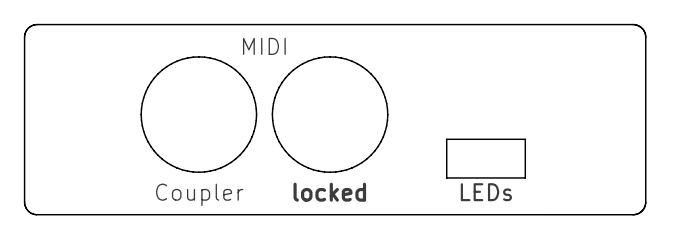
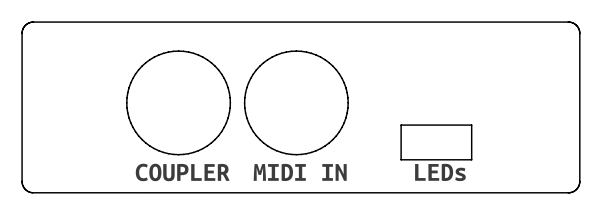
text: MIDI (264, 46) -> none
drawing: none -> [135, 163, 230, 182]
drawing: none -> [253, 163, 347, 182]
drawing: none -> [415, 163, 466, 182]
text: locked (329, 192) -> none
text: LEDs (486, 192) -> none
text: Coupler (199, 194) -> none

